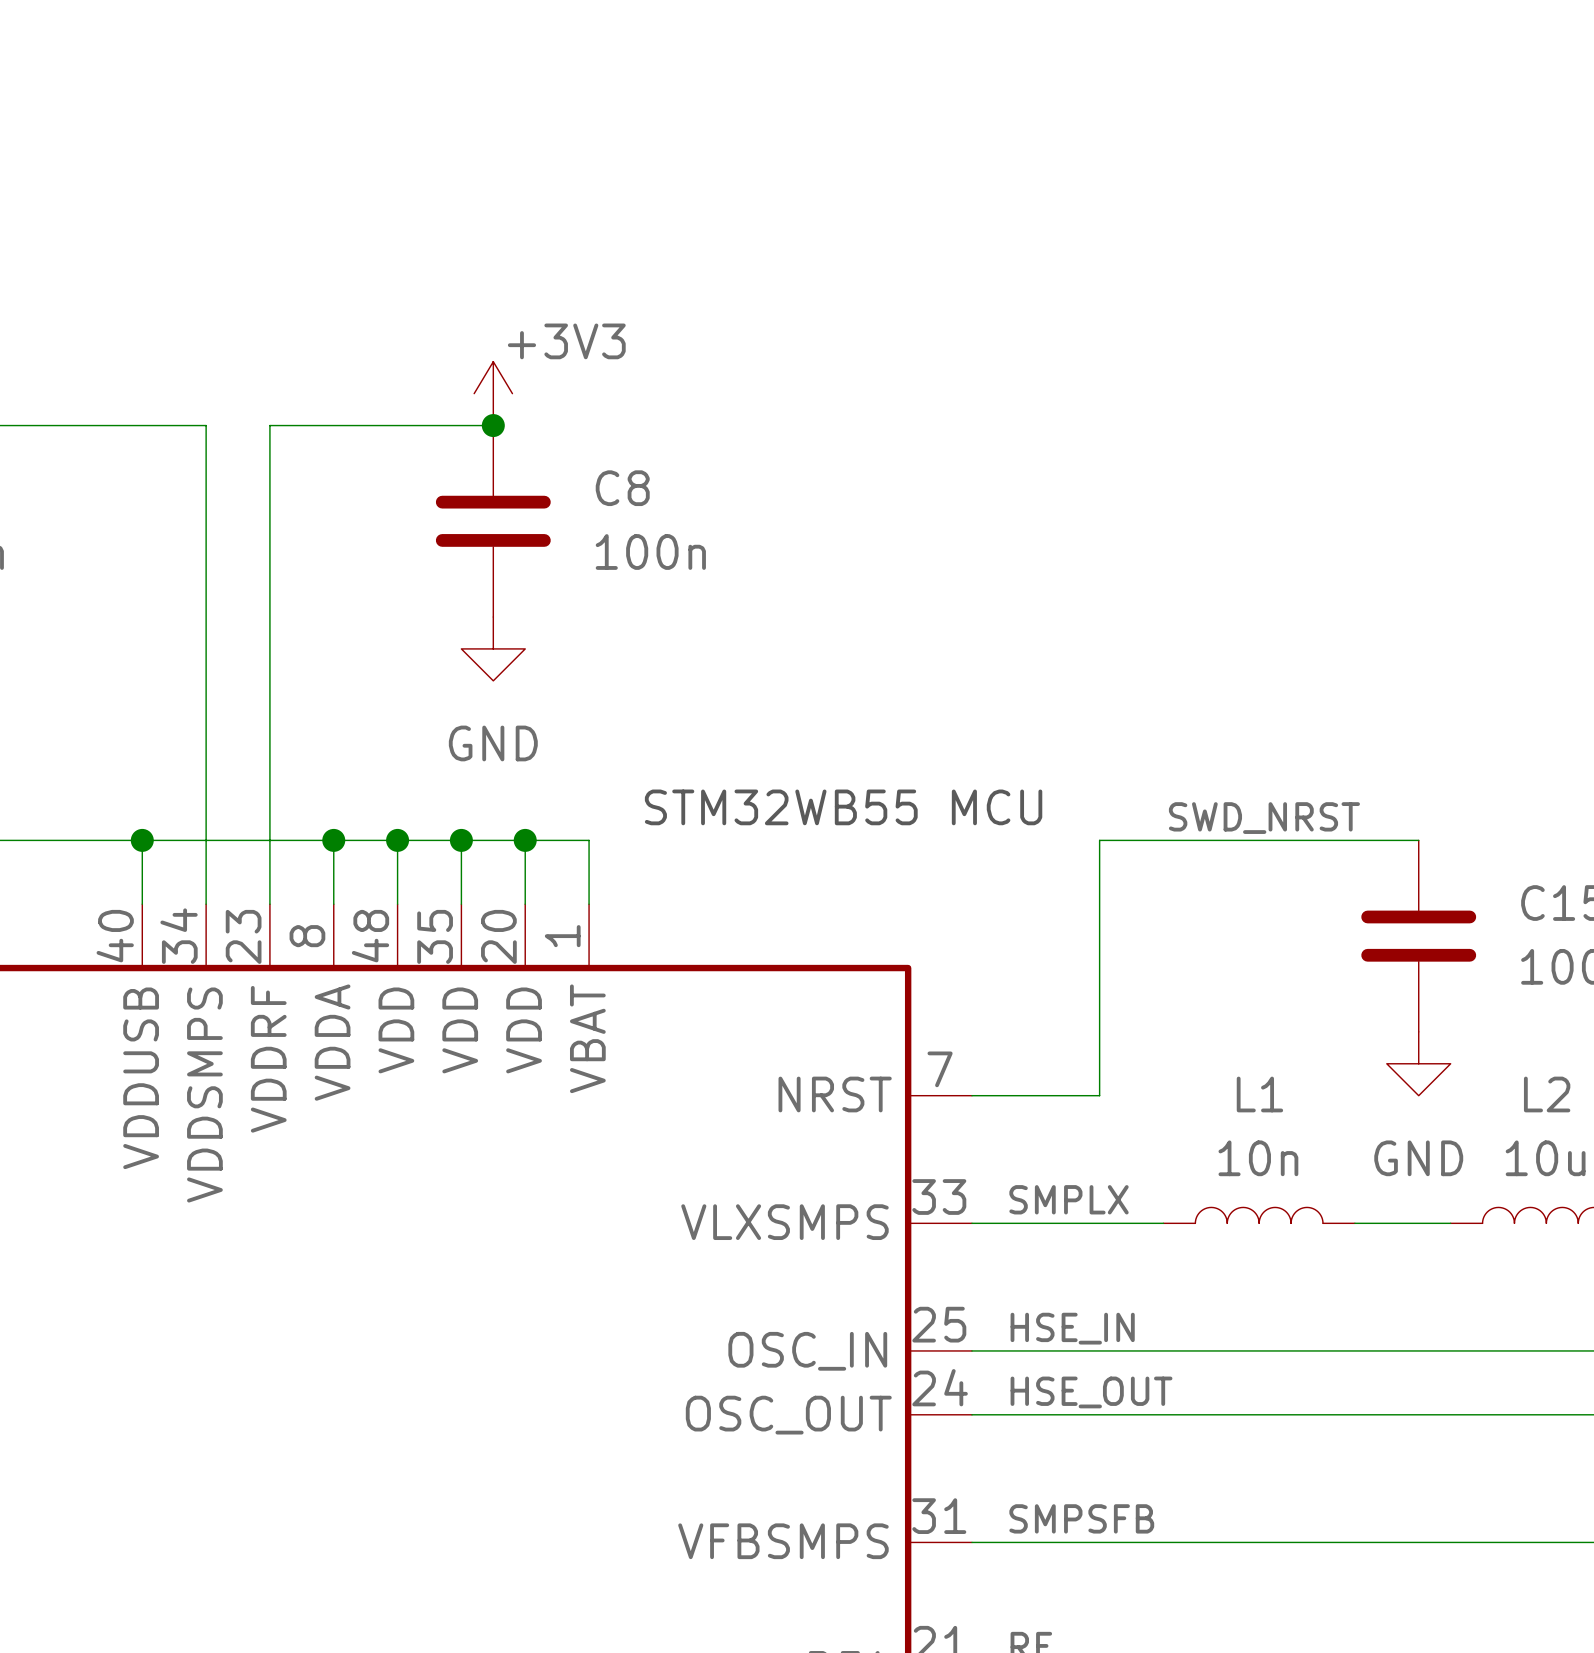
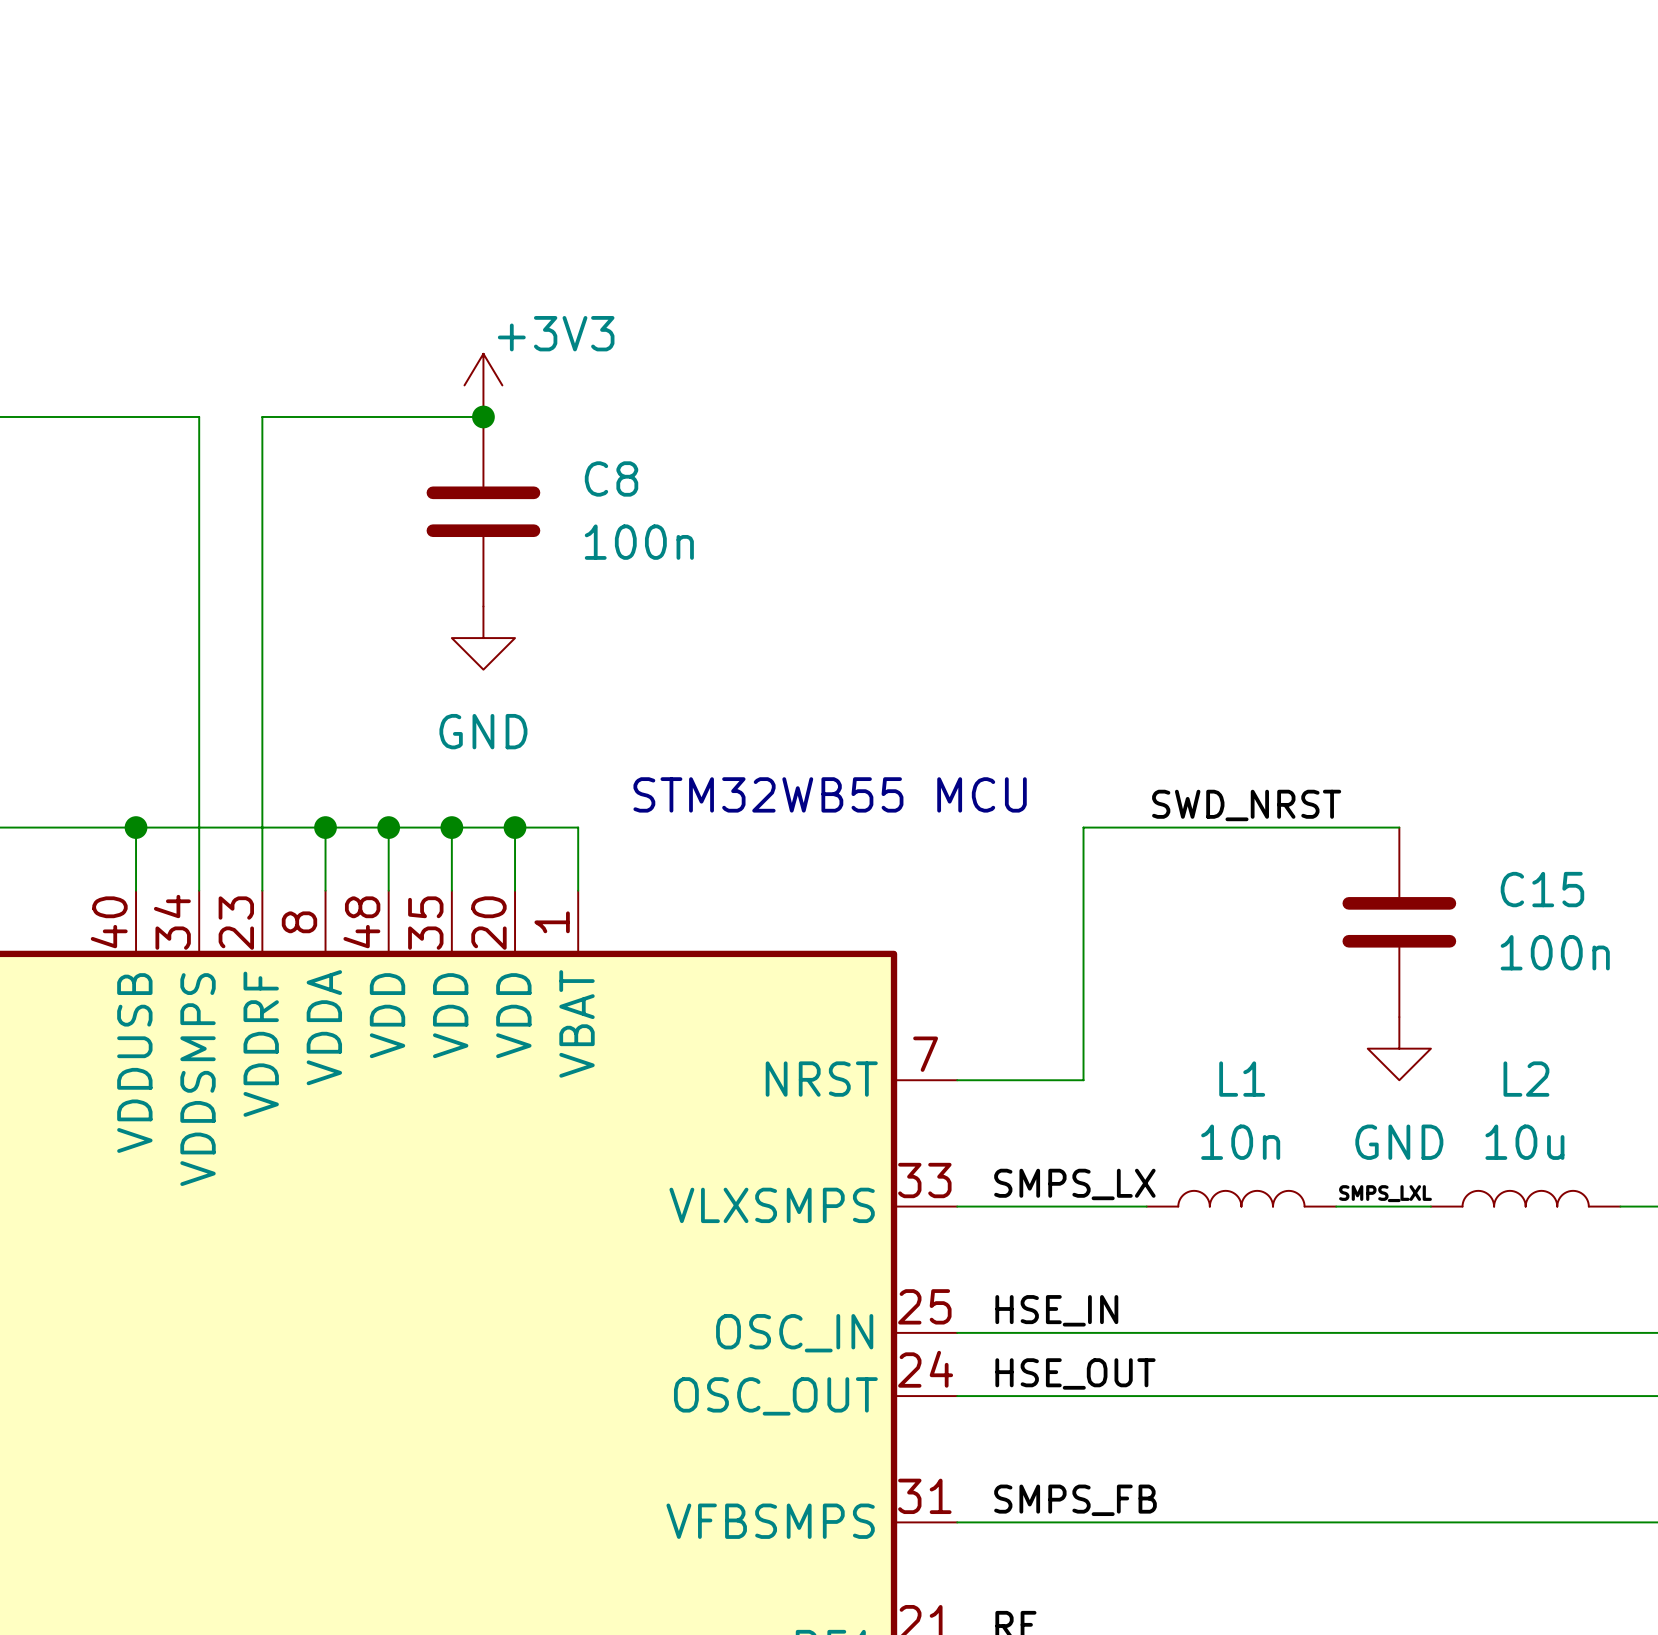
label: SMPLX (1069, 1199) -> SMPS_LX (1074, 1184)
label: none -> SMPS_LXL (1385, 1193)
label: SMPSFB (1081, 1518) -> SMPS_FB (1075, 1500)

